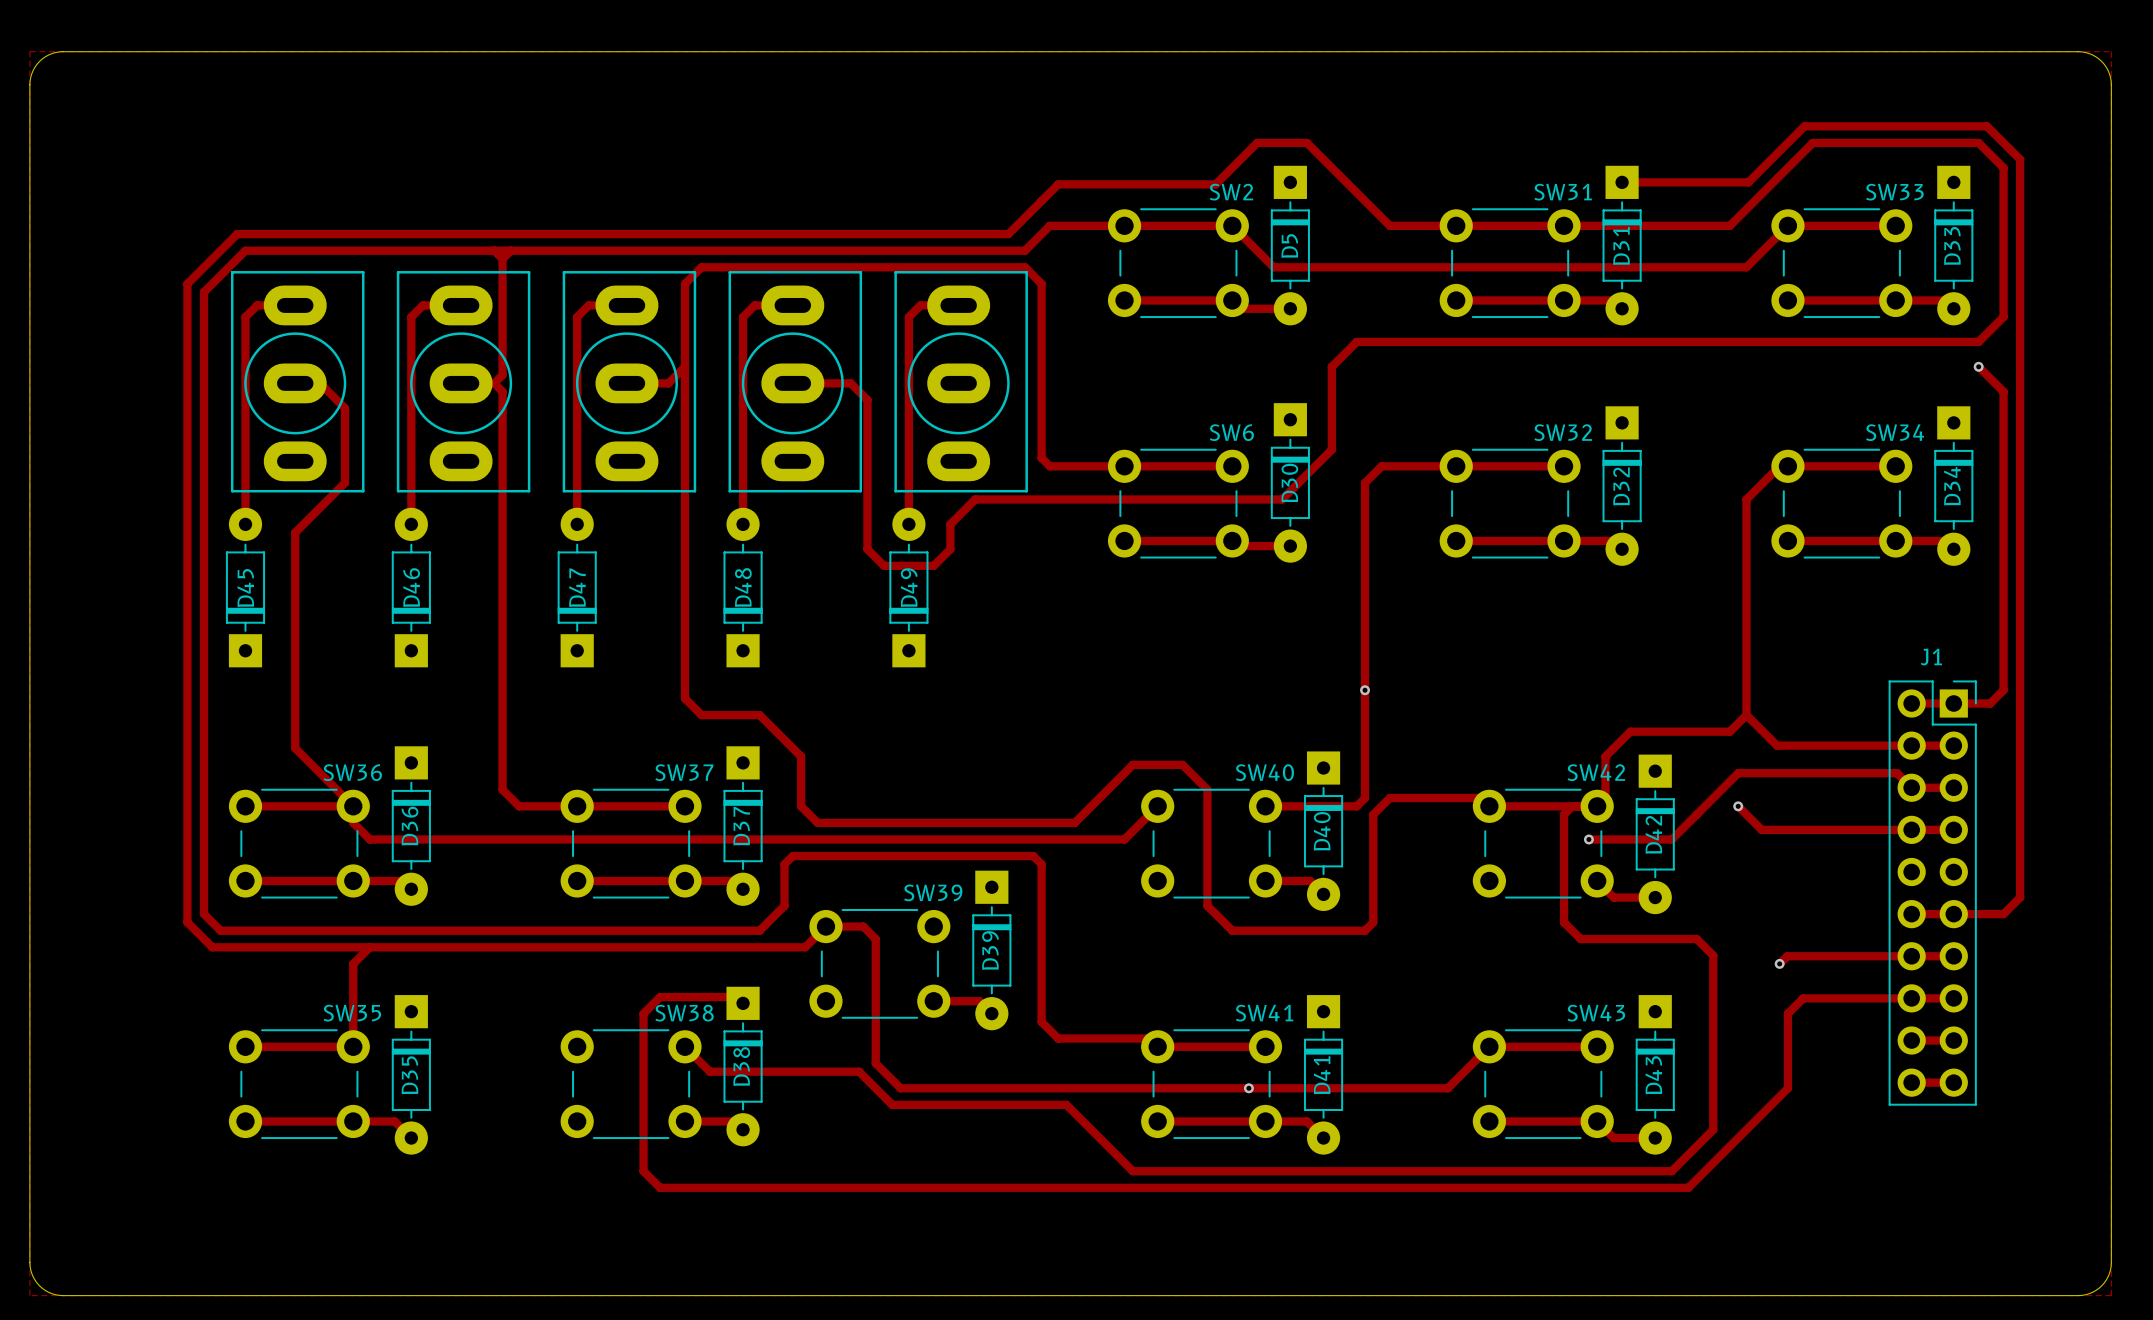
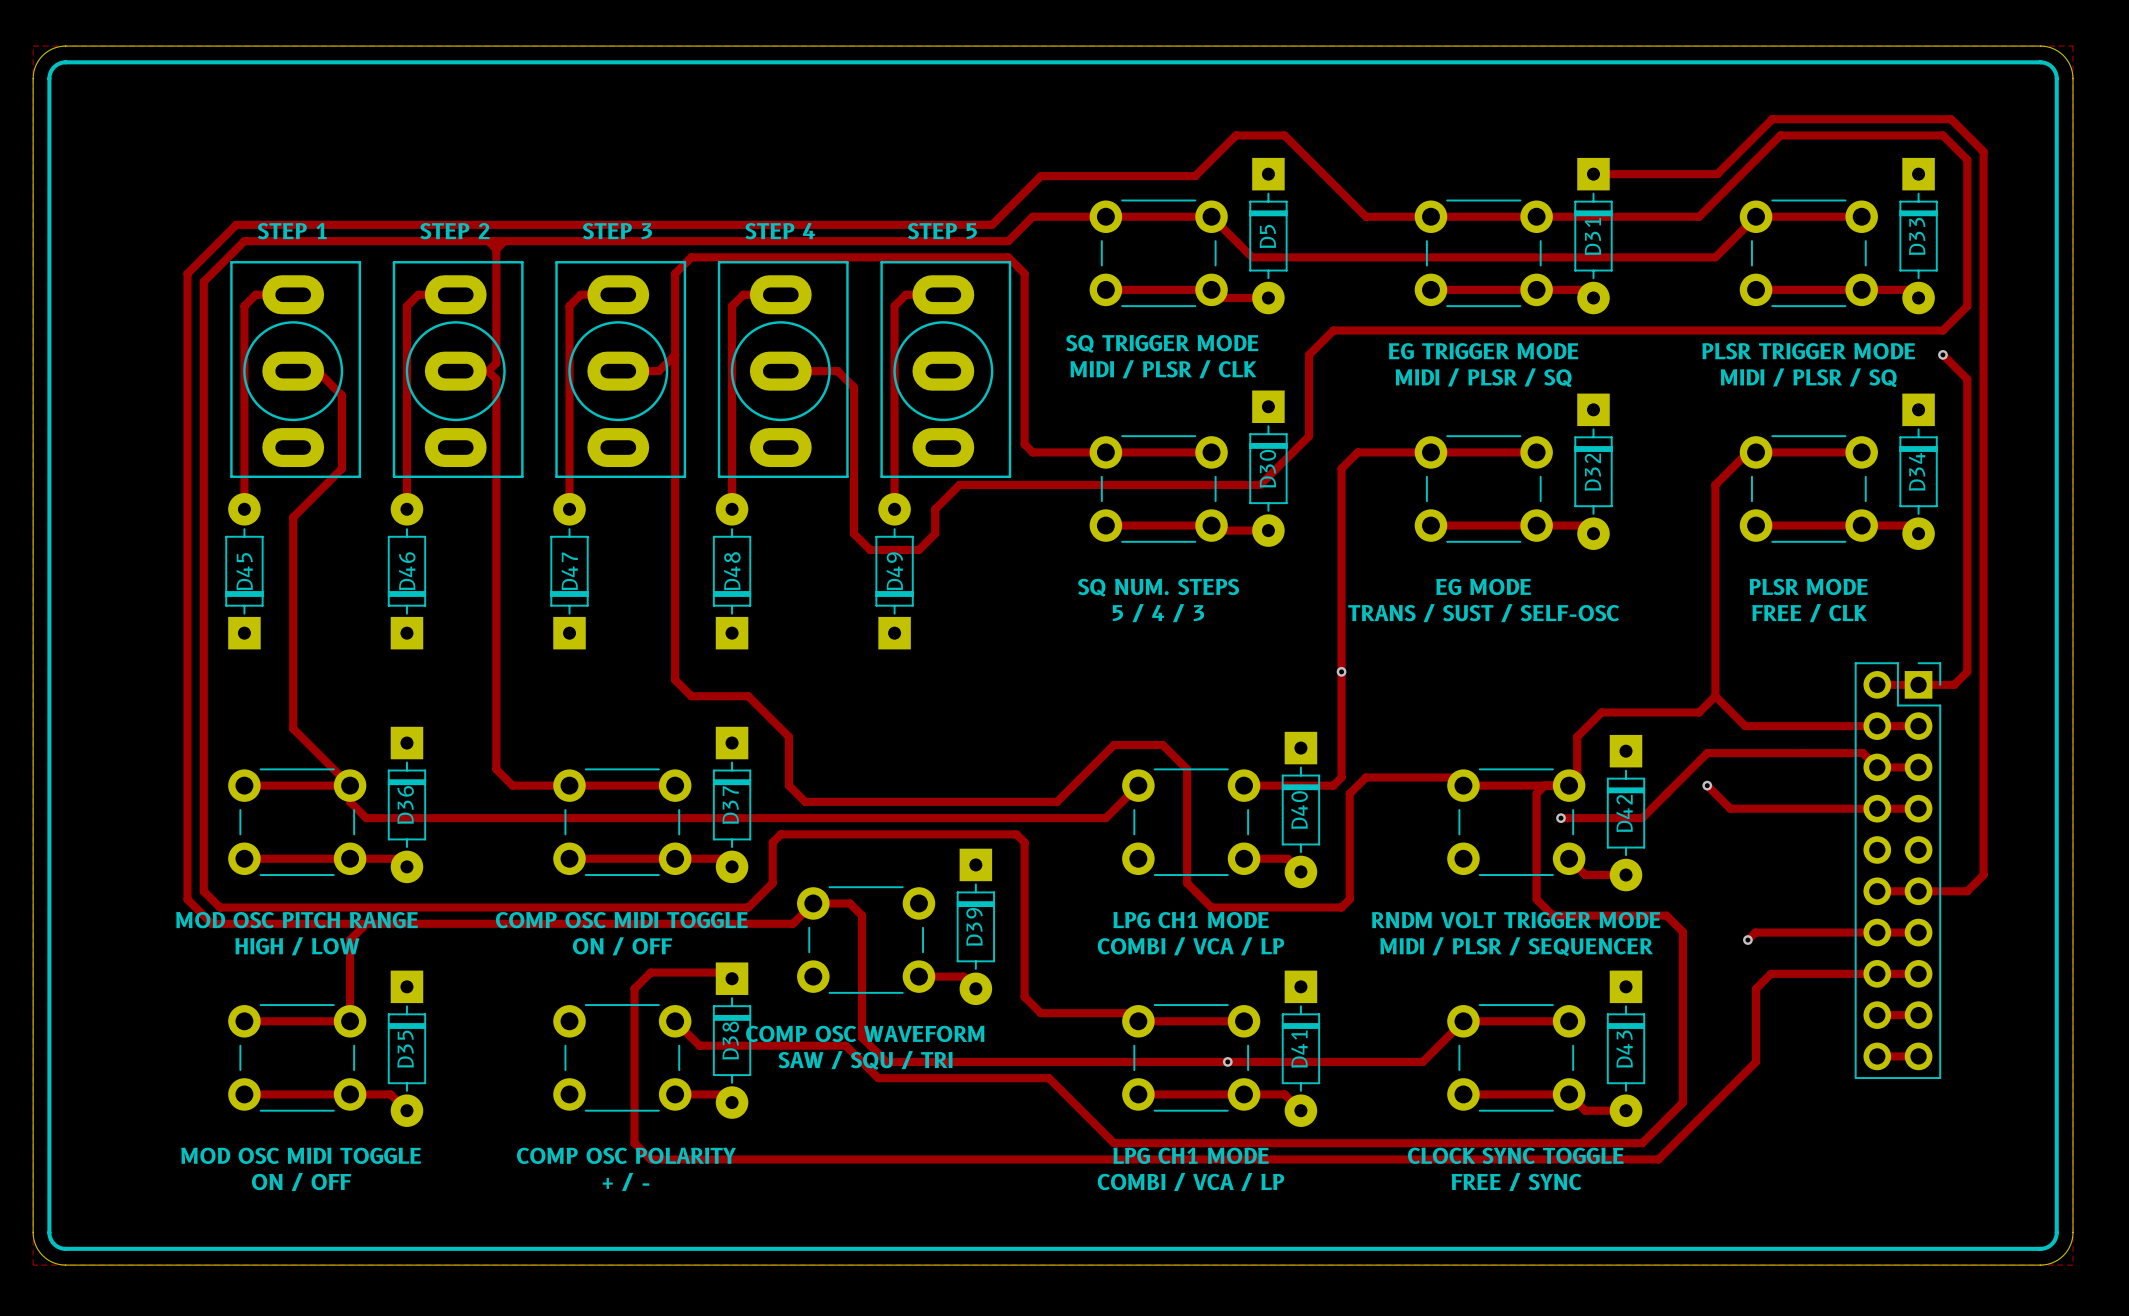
line: none -> (65, 62) (2040, 62) (2049, 64) (2055, 71) (2056, 78) (2056, 1232) (2054, 1241) (2047, 1247) (2040, 1248) (65, 1248) (56, 1246) (51, 1239) (49, 1232) (49, 78) (54, 67) (65, 62)
SW2 name: SW2 (1231, 192) -> none
SW31 name: SW31 (1563, 192) -> none
SW33 name: SW33 (1894, 192) -> none
text: none -> STEP 1 (292, 231)
text: none -> STEP 2 (454, 231)
text: none -> STEP 3 (617, 231)
text: none -> STEP 4 (780, 231)
text: none -> STEP 5 (942, 231)
text: none -> SQ TRIGGER MODE (1162, 343)
text: none -> EG TRIGGER MODE (1483, 351)
text: none -> PLSR TRIGGER MODE (1808, 351)
text: none -> MIDI / PLSR / CLK (1163, 369)
text: none -> MIDI / PLSR / SQ (1483, 377)
text: none -> MIDI / PLSR / SQ (1808, 377)
SW6 name: SW6 (1231, 432) -> none
SW32 name: SW32 (1563, 432) -> none
SW34 name: SW34 (1895, 432) -> none
text: none -> EG MODE (1483, 586)
text: none -> PLSR MODE (1808, 586)
text: none -> SQ NUM. STEPS (1158, 587)
text: none -> 5 / 4 / 3 (1158, 613)
text: none -> TRANS / SUST / SELF-OSC (1483, 613)
text: none -> FREE / CLK (1809, 613)
J1 name: J1 (1931, 657) -> none
SW36 name: SW36 (352, 772) -> none
SW37 name: SW37 (684, 772) -> none
SW40 name: SW40 (1264, 772) -> none
SW42 name: SW42 (1596, 772) -> none
SW39 name: SW39 (933, 892) -> none
text: none -> MOD OSC PITCH RANGE (297, 920)
text: none -> COMP OSC MIDI TOGGLE (621, 920)
text: none -> LPG CH1 MODE (1191, 920)
text: none -> RNDM VOLT TRIGGER MODE (1516, 920)
text: none -> HIGH / LOW (297, 946)
text: none -> ON / OFF (622, 946)
text: none -> COMBI / VCA / LP (1190, 946)
text: none -> MIDI / PLSR / SEQUENCER (1516, 946)
SW35 name: SW35 (352, 1013) -> none
SW38 name: SW38 (684, 1013) -> none
SW41 name: SW41 (1264, 1013) -> none
SW43 name: SW43 (1596, 1013) -> none
text: none -> COMP OSC WAVEFORM (865, 1033)
text: none -> SAW / SQU / TRI (865, 1060)
text: none -> MOD OSC MIDI TOGGLE (301, 1155)
text: none -> COMP OSC POLARITY (626, 1155)
text: none -> LPG CH1 MODE (1191, 1155)
text: none -> CLOCK SYNC TOGGLE (1515, 1155)
text: none -> ON / OFF (301, 1181)
text: none -> + / - (626, 1181)
text: none -> COMBI / VCA / LP (1190, 1181)
text: none -> FREE / SYNC (1516, 1181)

